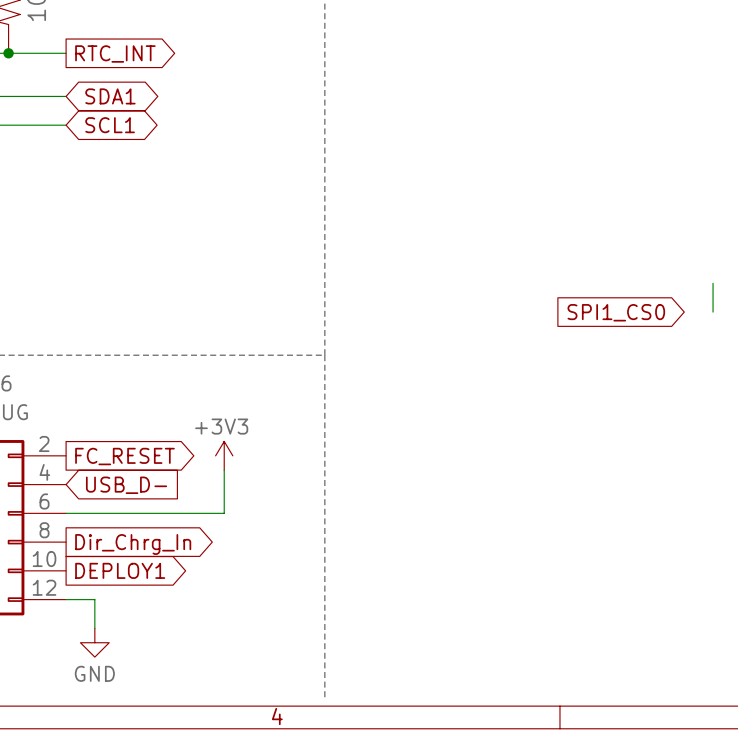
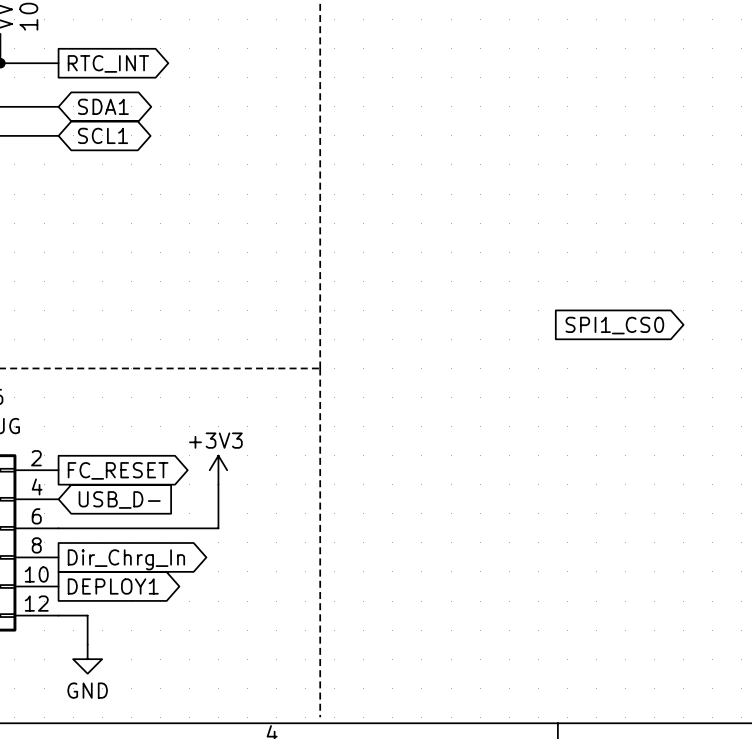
wire: (713, 283) (713, 312) -> none

